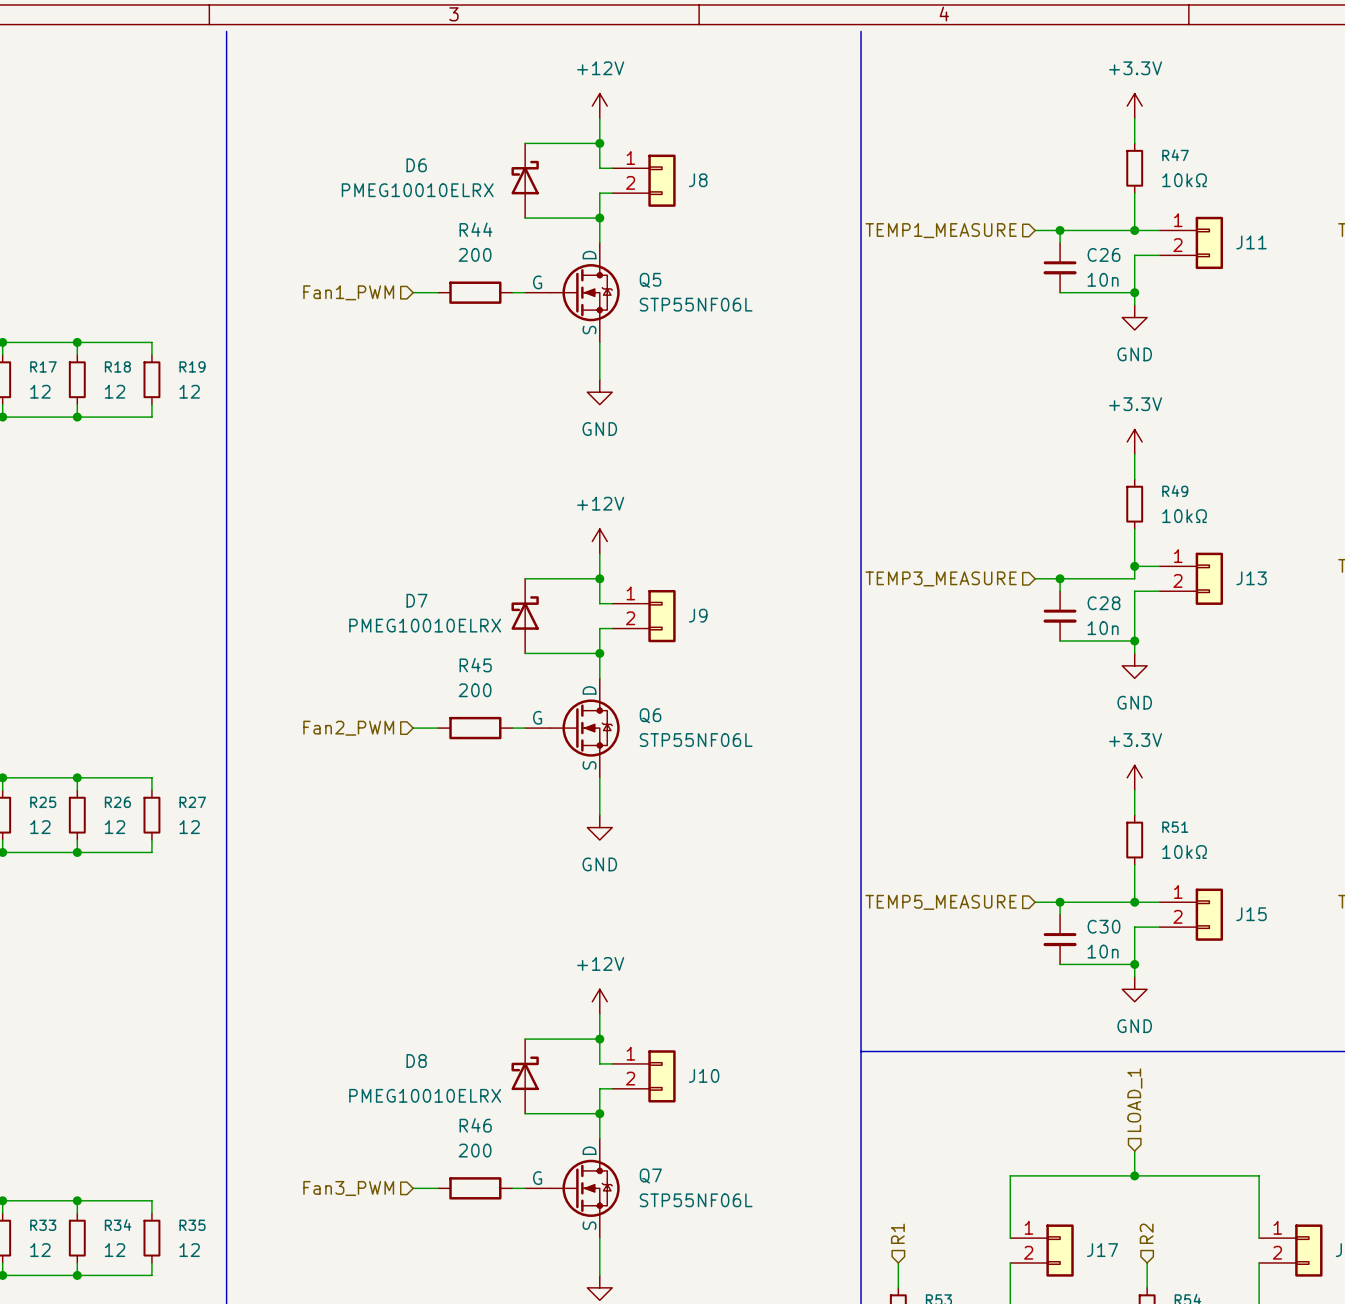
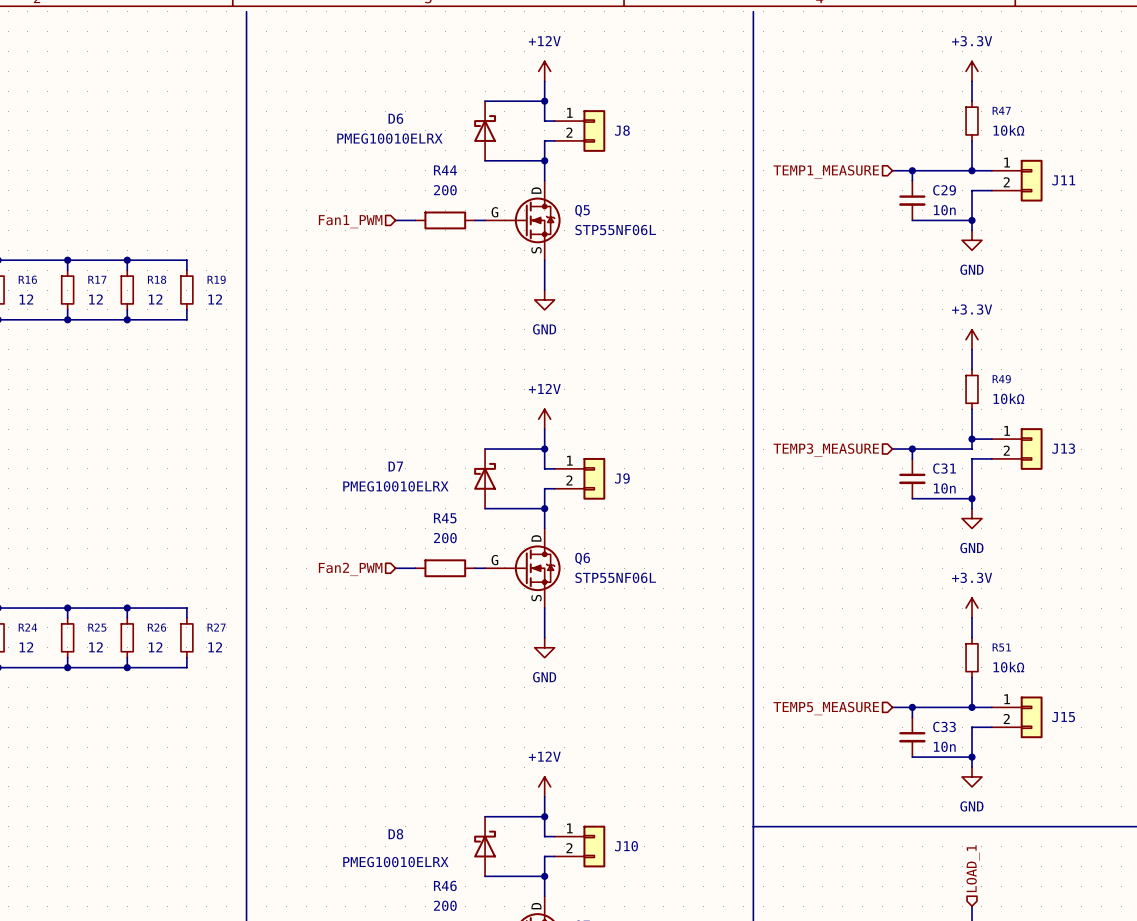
C26 name: C26 (1103, 254) -> C29 (944, 190)
C28 name: C28 (1103, 603) -> C31 (944, 468)
C30 name: C30 (1103, 926) -> C33 (944, 726)

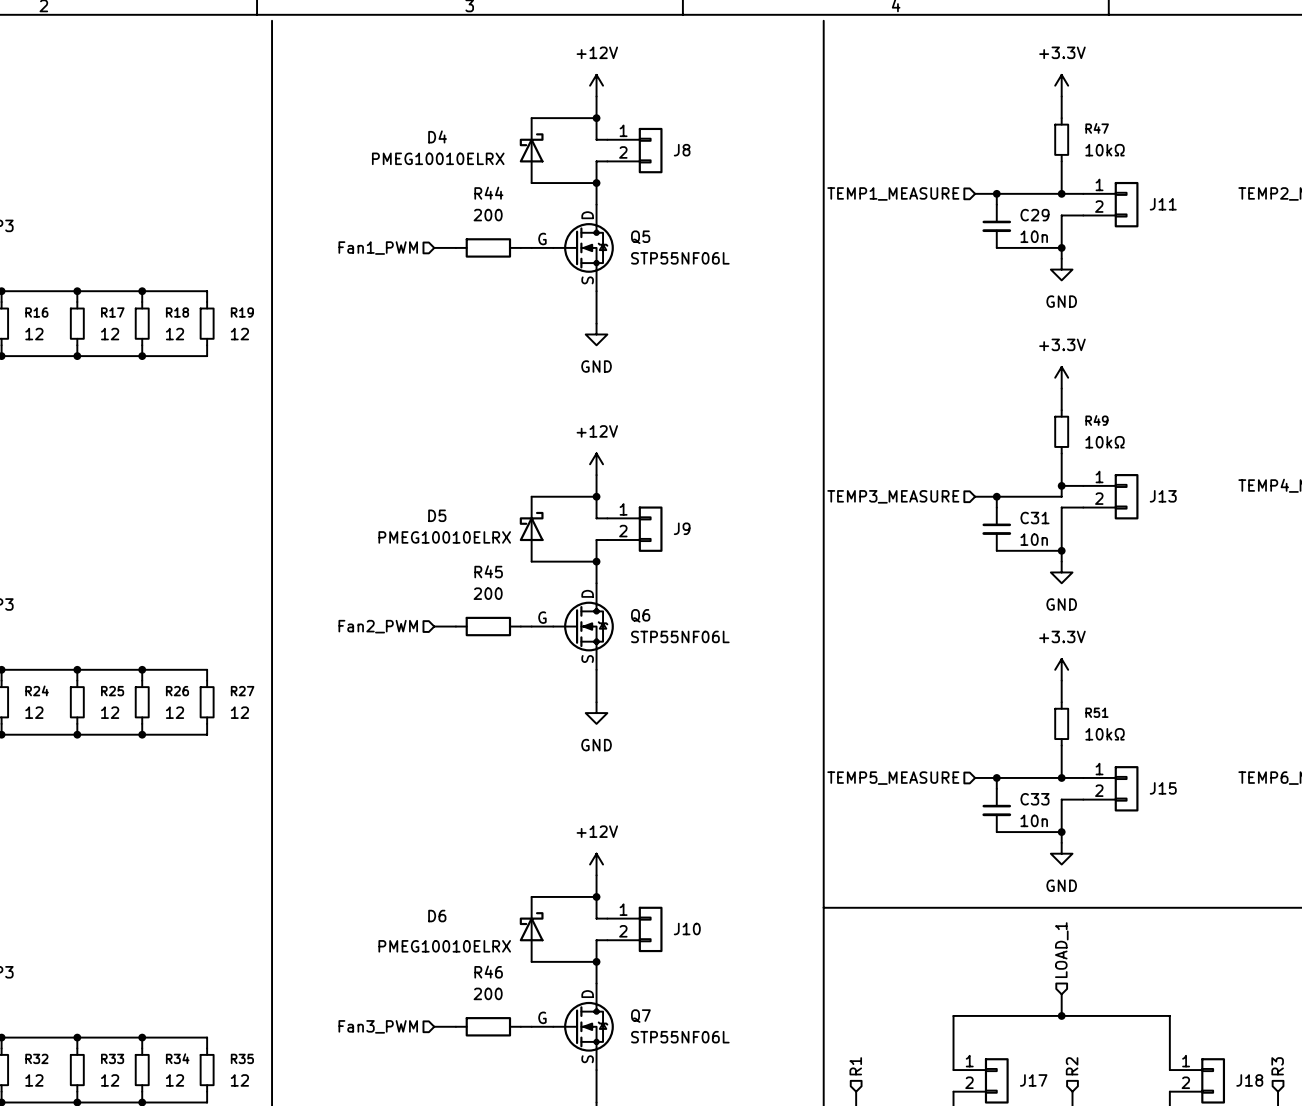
D6 name: D6 (395, 118) -> D4 (437, 136)
D7 name: D7 (395, 466) -> D5 (437, 515)
D8 name: D8 (395, 834) -> D6 (437, 916)

